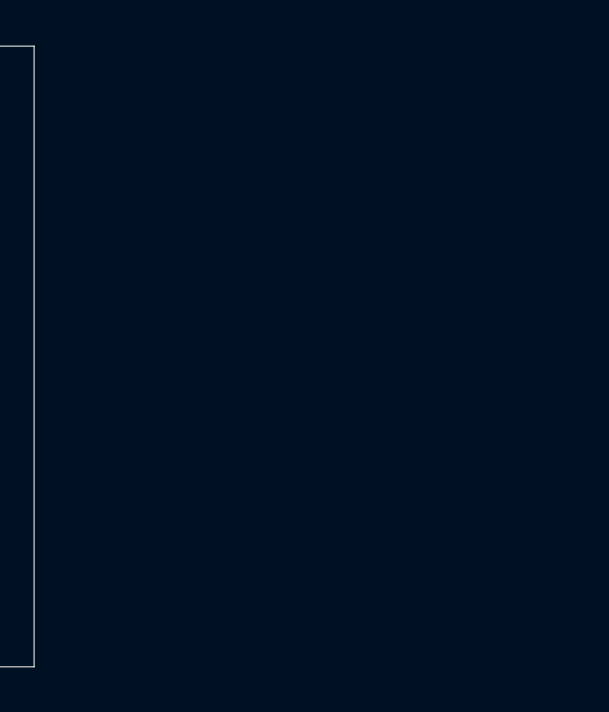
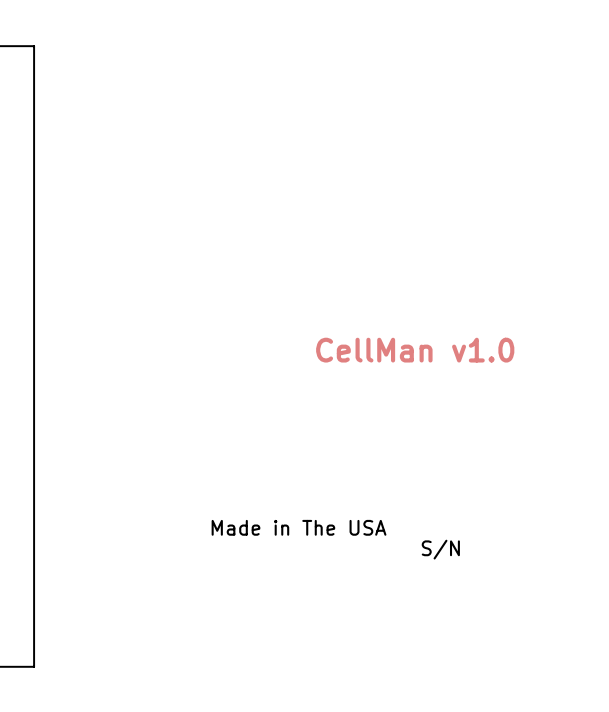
text: none -> CellMan v1.0 (415, 350)
text: none -> Made in The USA (299, 527)
text: none -> S/N (440, 549)

